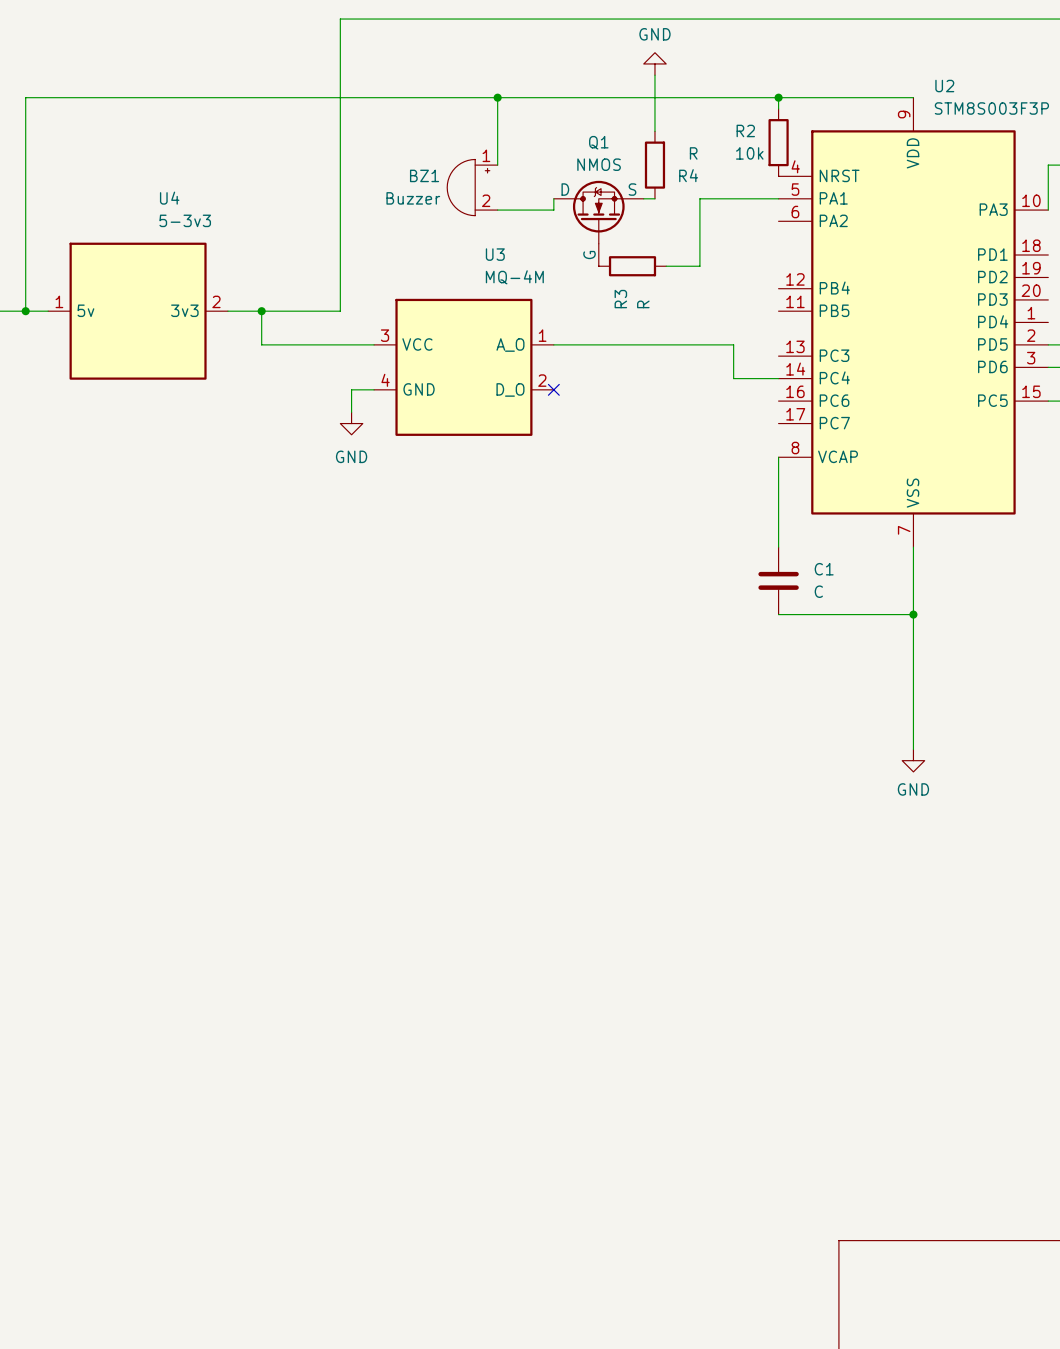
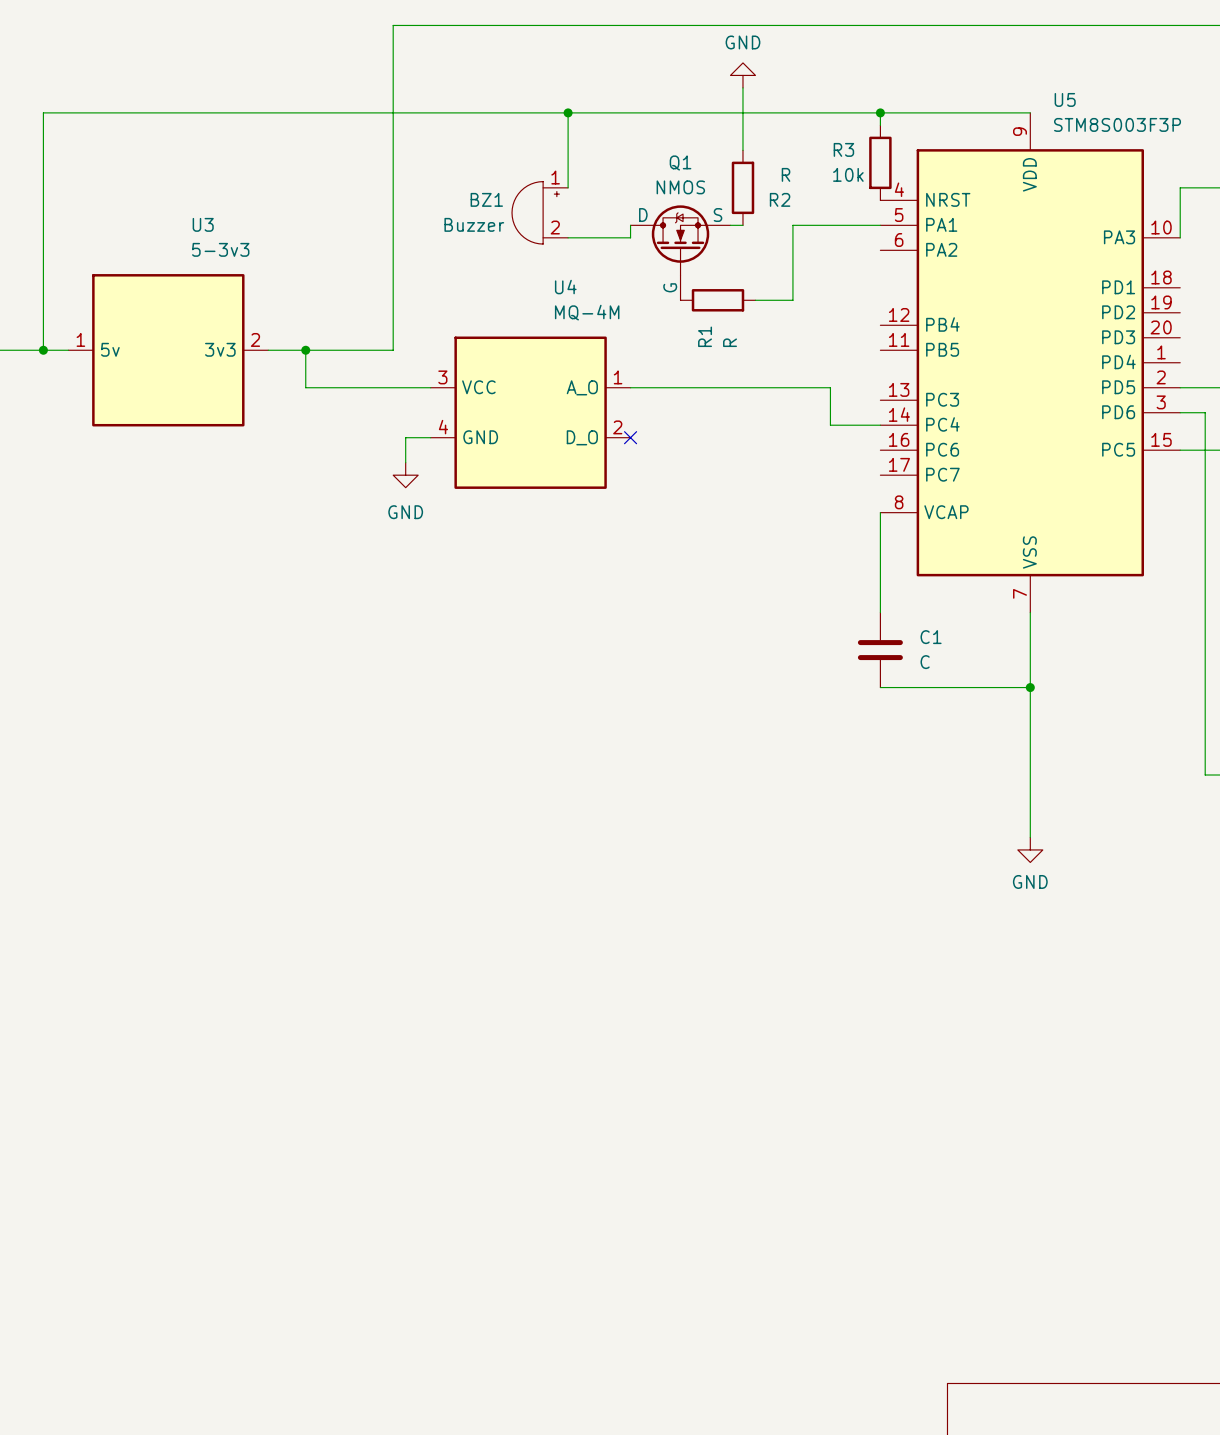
U2 name: U2 (944, 86) -> U5 (1065, 99)
R2 name: R2 (745, 130) -> R3 (843, 149)
R4 name: R4 (688, 175) -> R2 (780, 199)
U4 name: U4 (169, 198) -> U3 (203, 224)
U3 name: U3 (495, 254) -> U4 (565, 287)
R3 name: R3 (620, 299) -> R1 (705, 336)

